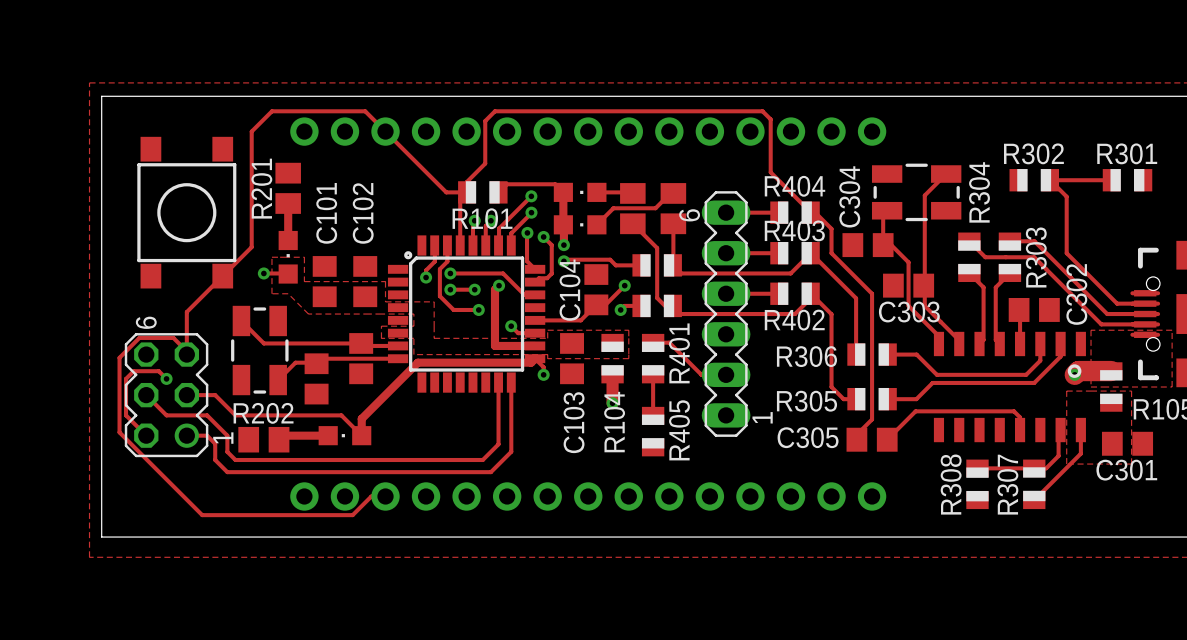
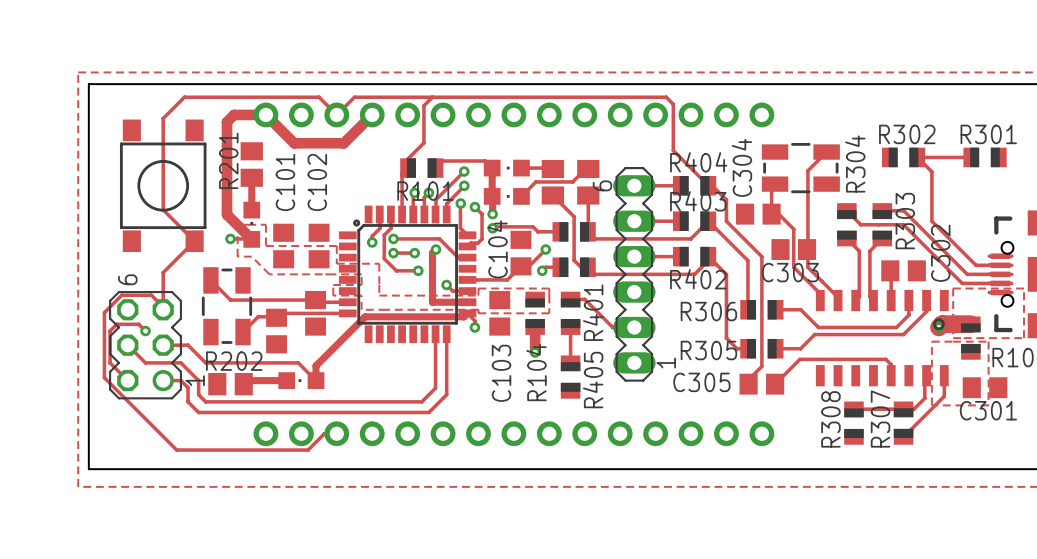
track: (271, 111) (251, 131) (251, 247) (222, 276) -> (237, 97) (184, 97) (163, 118) (163, 209) (194, 241)
track: (385, 131) (446, 192) (466, 192) -> (336, 114) (354, 97) (432, 97)
track: none -> (372, 114) (343, 143) (294, 143) (265, 114) (234, 114) (226, 122) (226, 214) (251, 238)

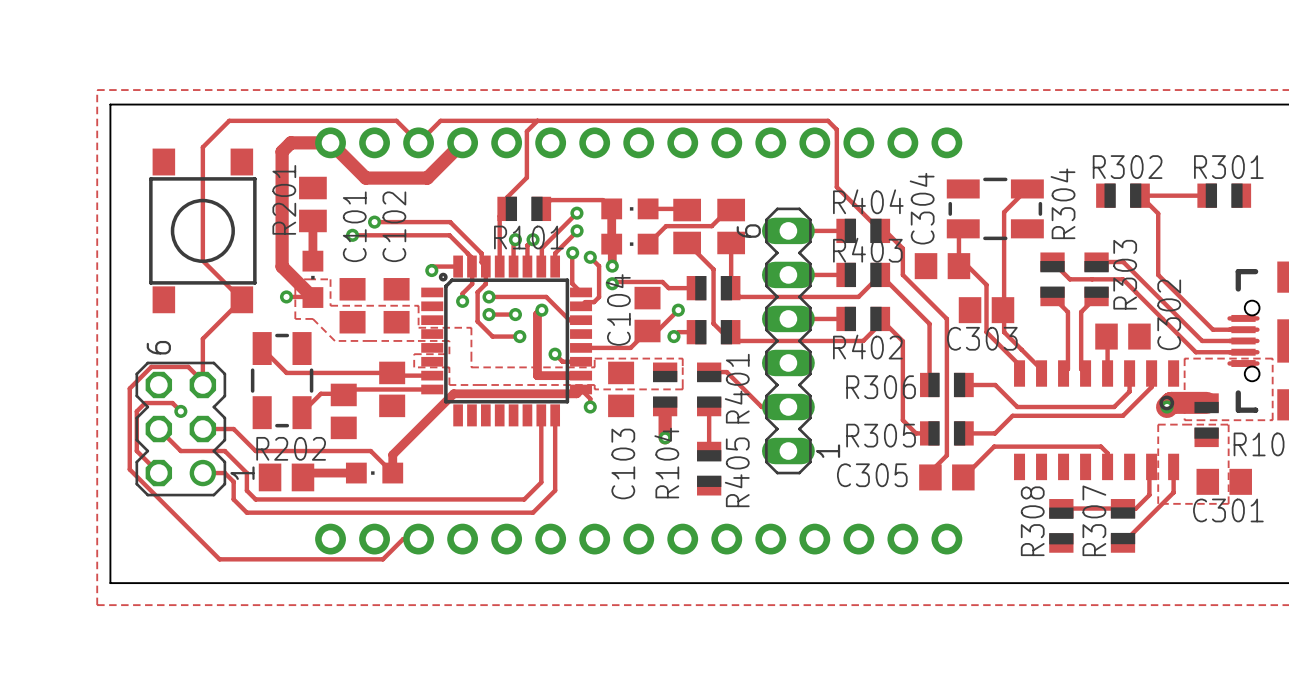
track: none -> (374, 222) (450, 222) (481, 253) (481, 262) (485, 266)
via: none -> (374, 222)
track: none -> (352, 235) (449, 235) (471, 257) (471, 266)
via: none -> (352, 235)
track: none -> (458, 266) (431, 266) (431, 270)
via: none -> (431, 270)

